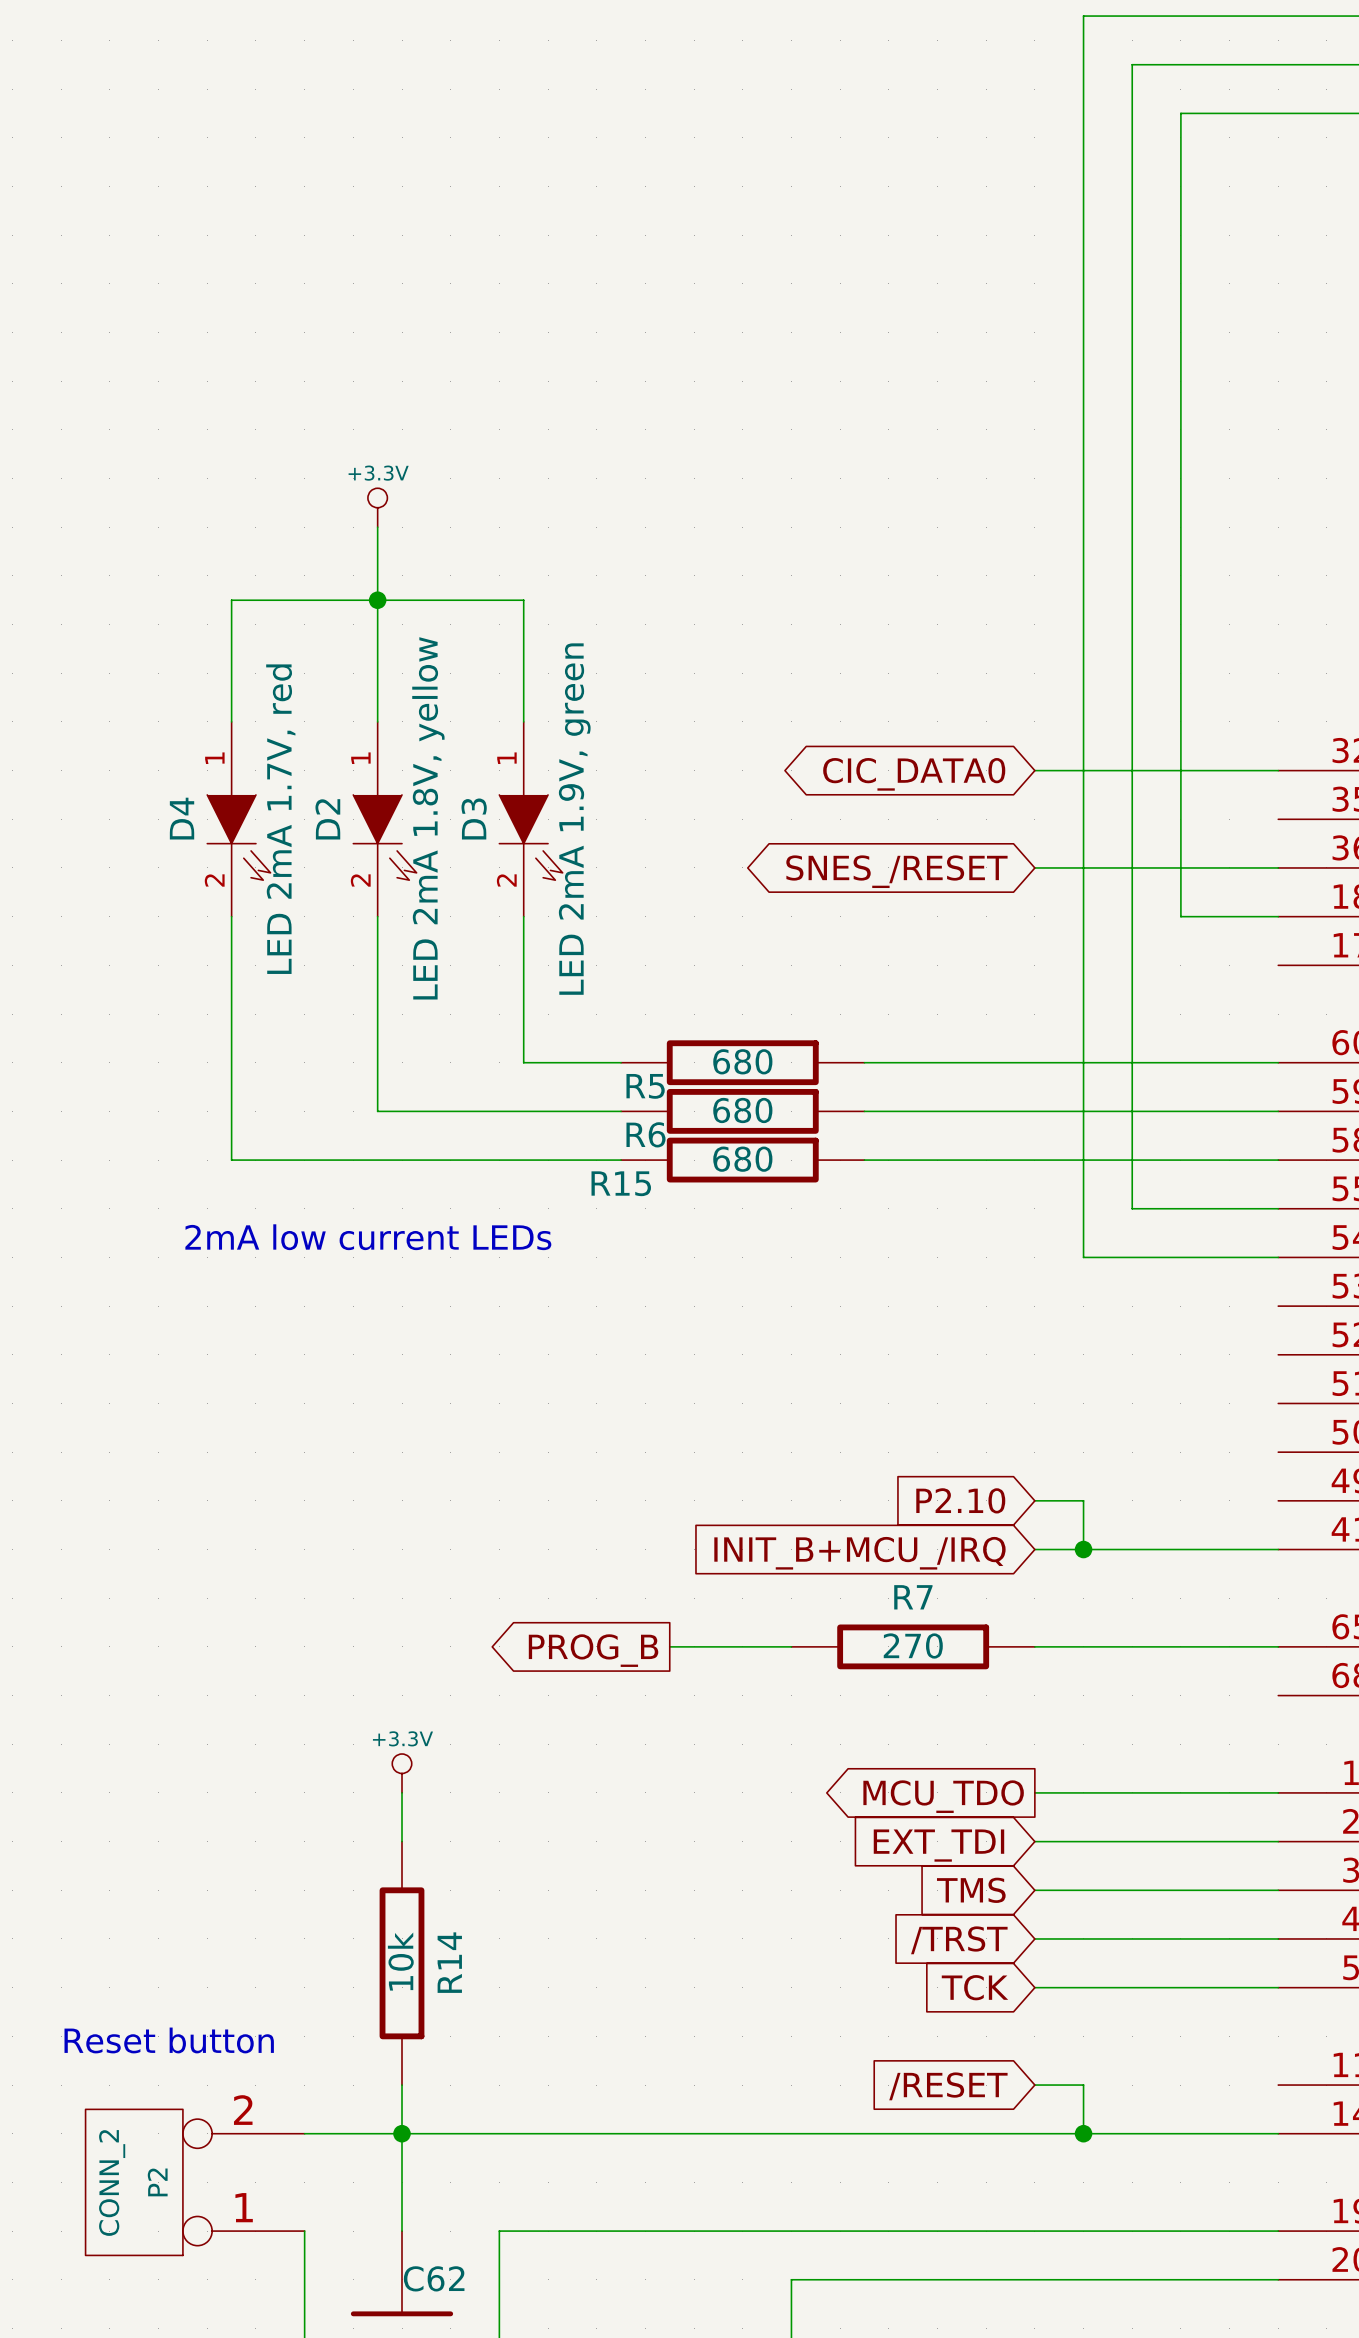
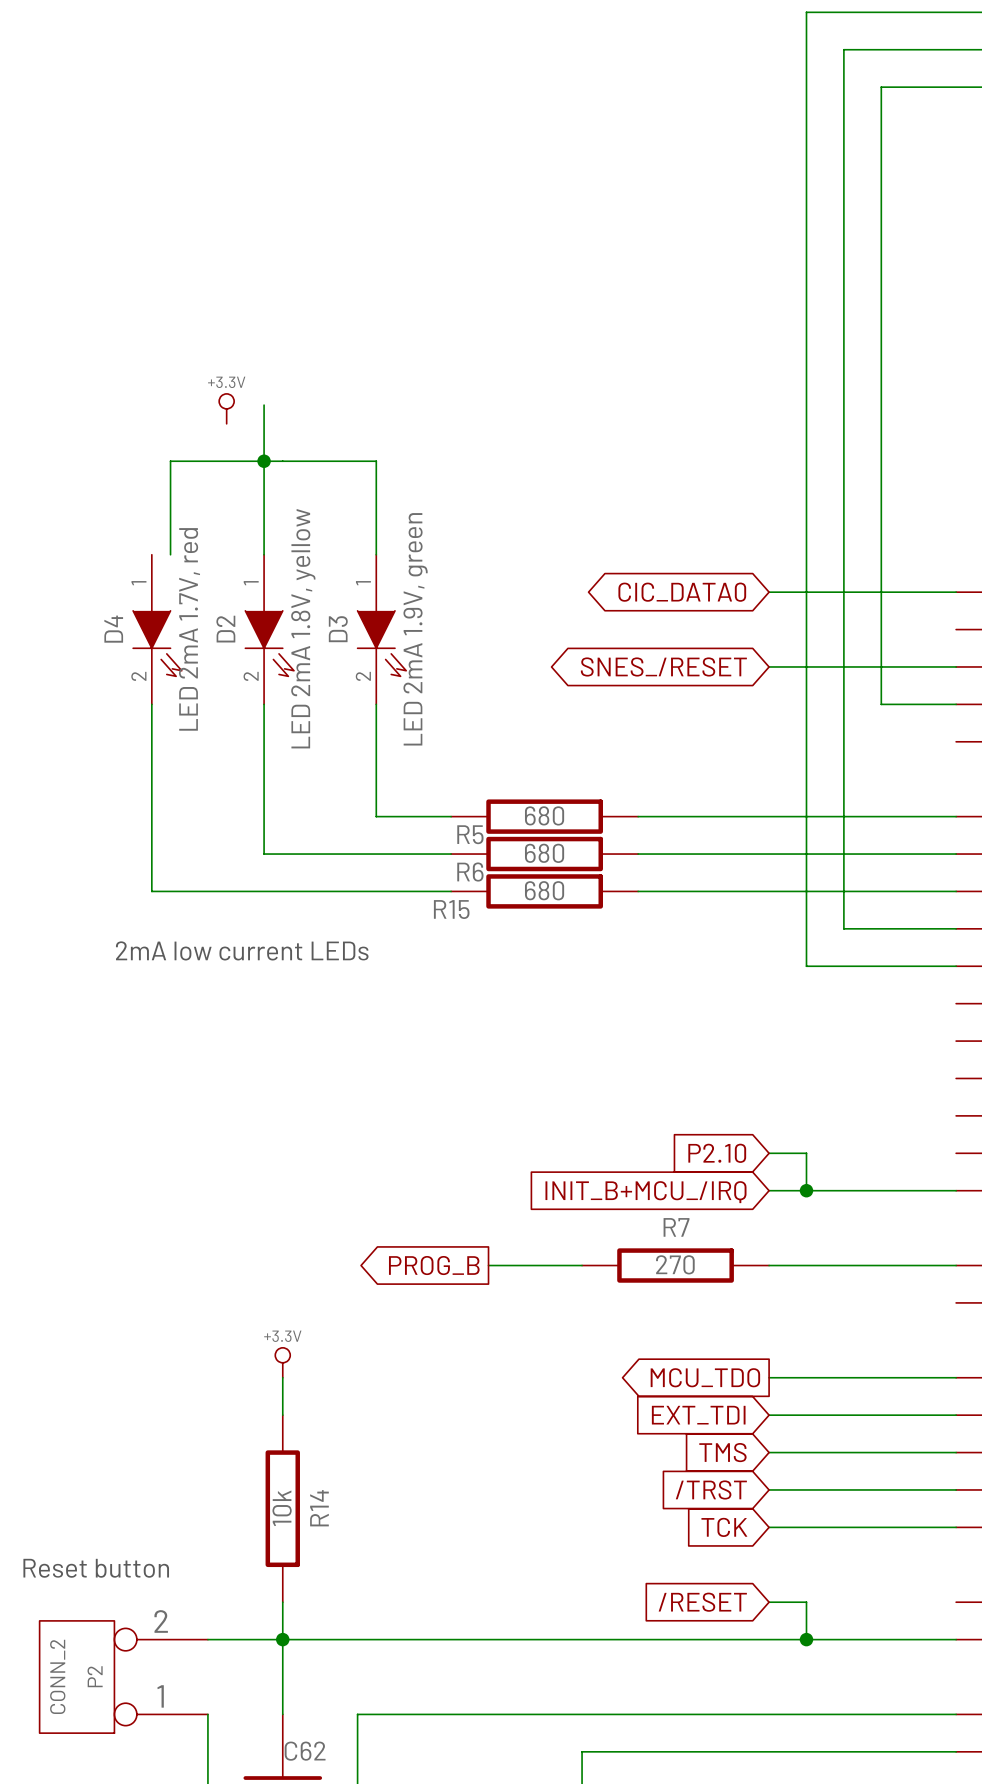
power symbol position: +3.3V (377, 507) -> +3.3V (226, 408)
wire: (255, 600) (231, 600) (231, 721) -> (170, 461) (170, 554)

